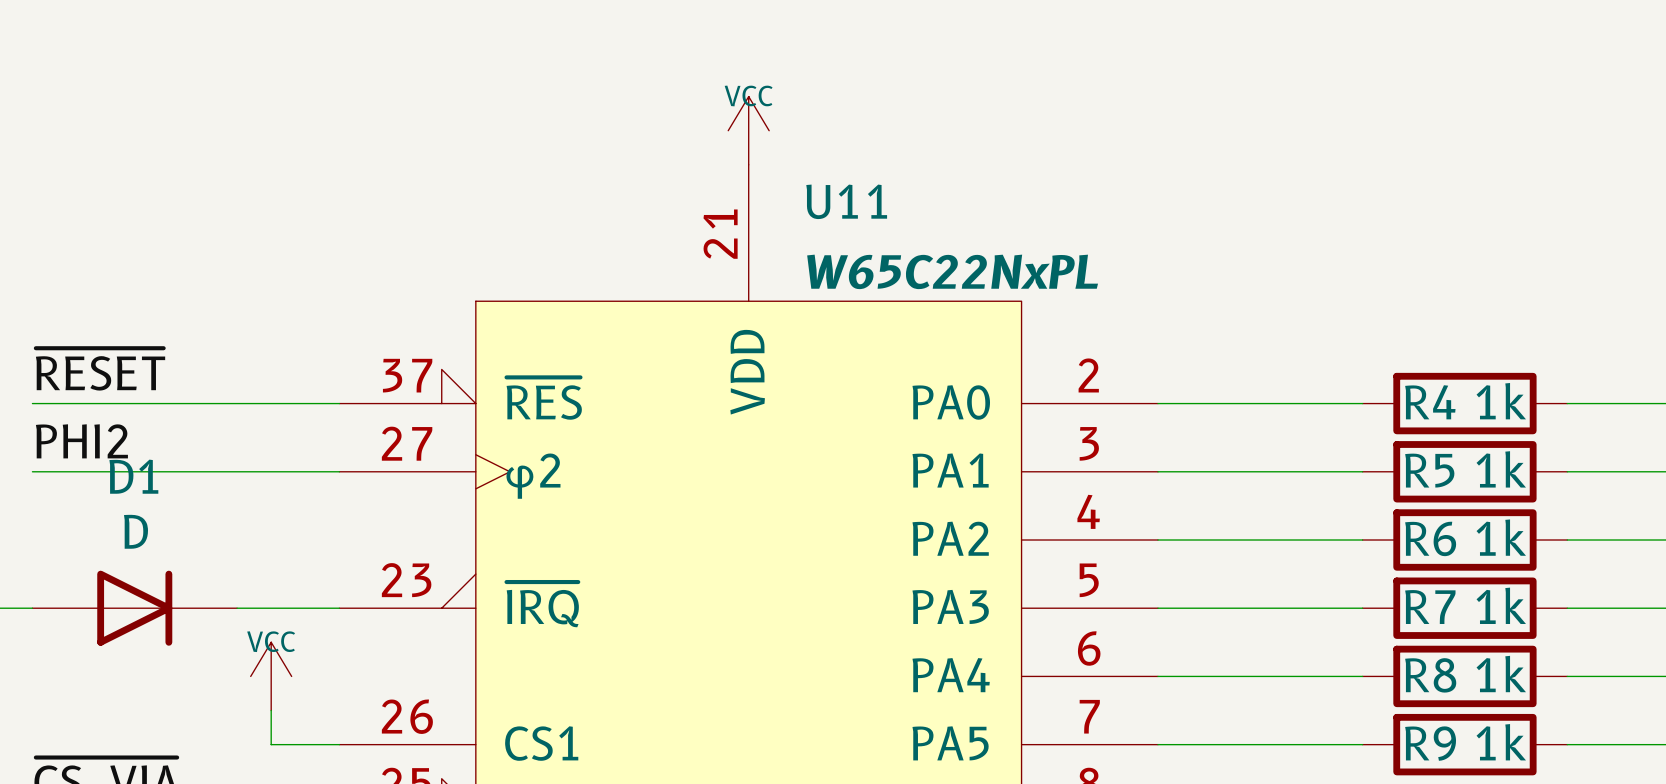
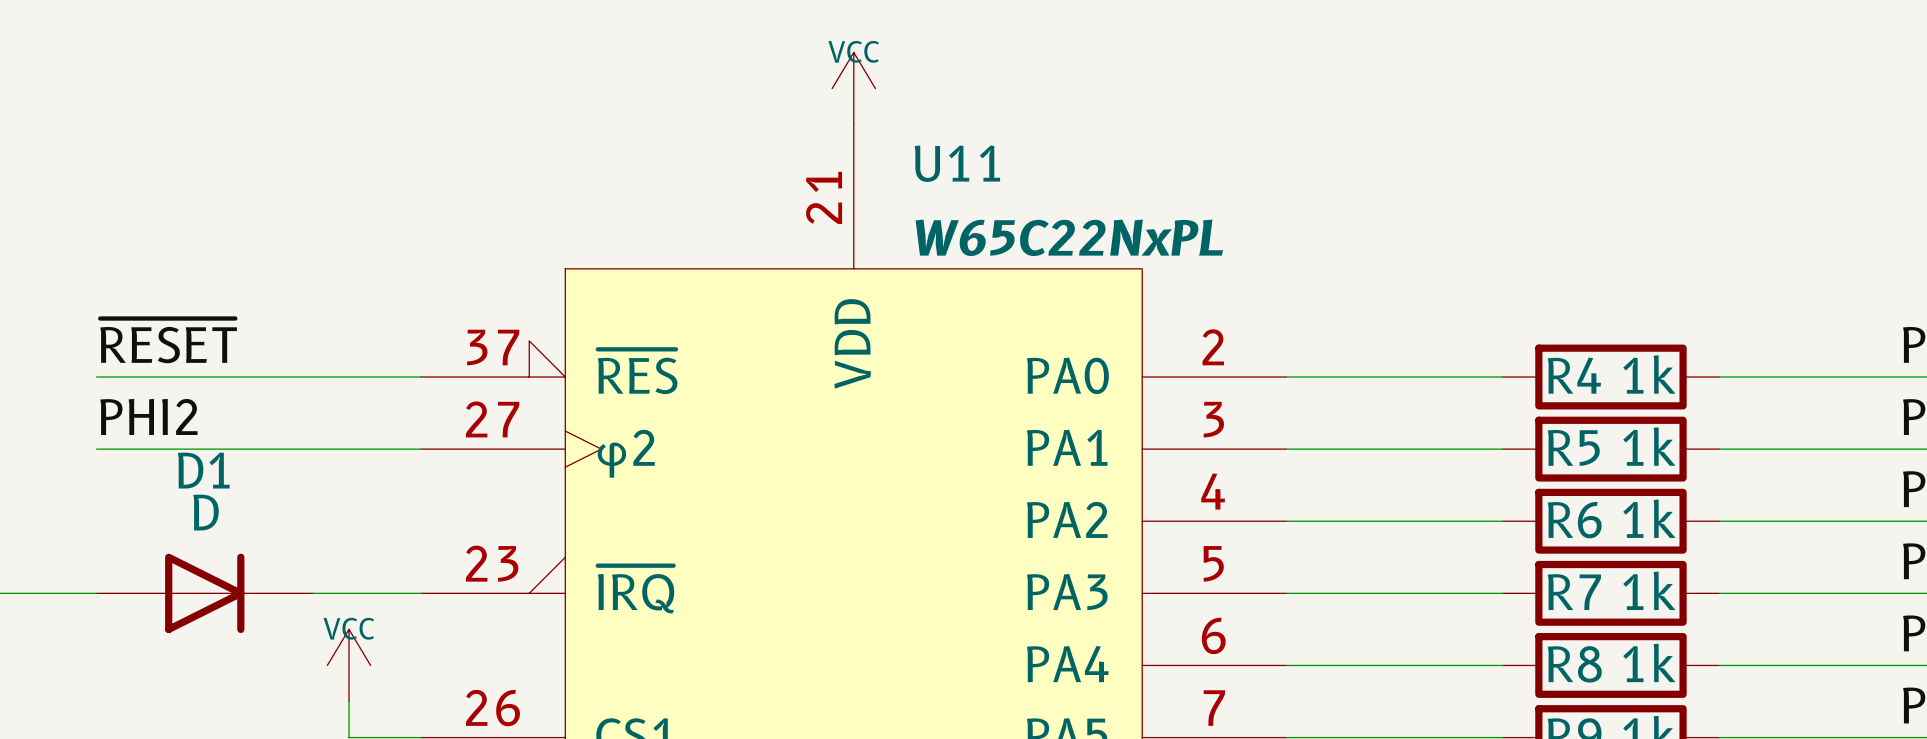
D1 name position: D1 (133, 476) -> D1 (203, 470)

